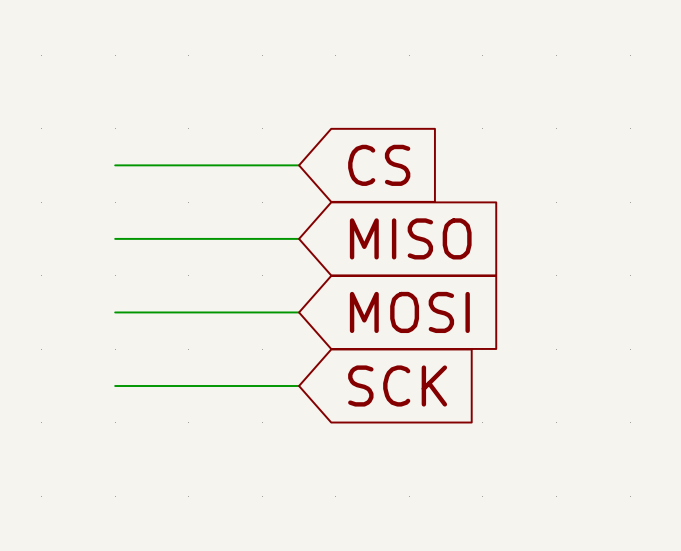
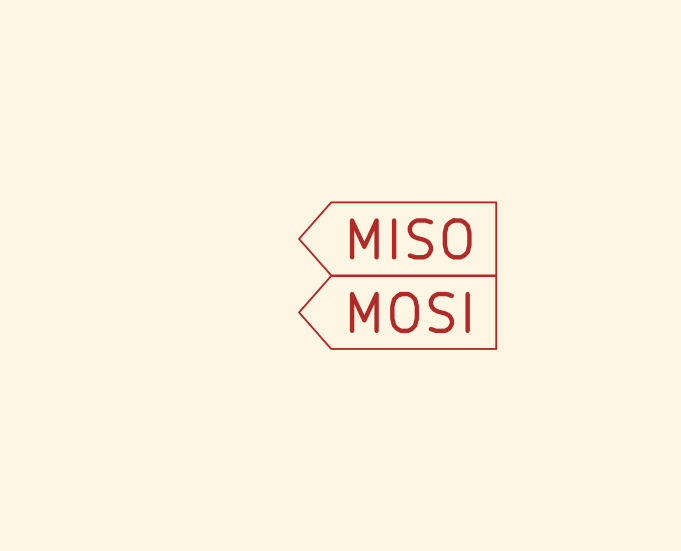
wire: (115, 165) (299, 165) -> none
global label: CS (379, 165) -> none
wire: (115, 238) (299, 238) -> none
wire: (115, 312) (299, 312) -> none
wire: (115, 386) (299, 386) -> none
global label: SCK (397, 386) -> none

